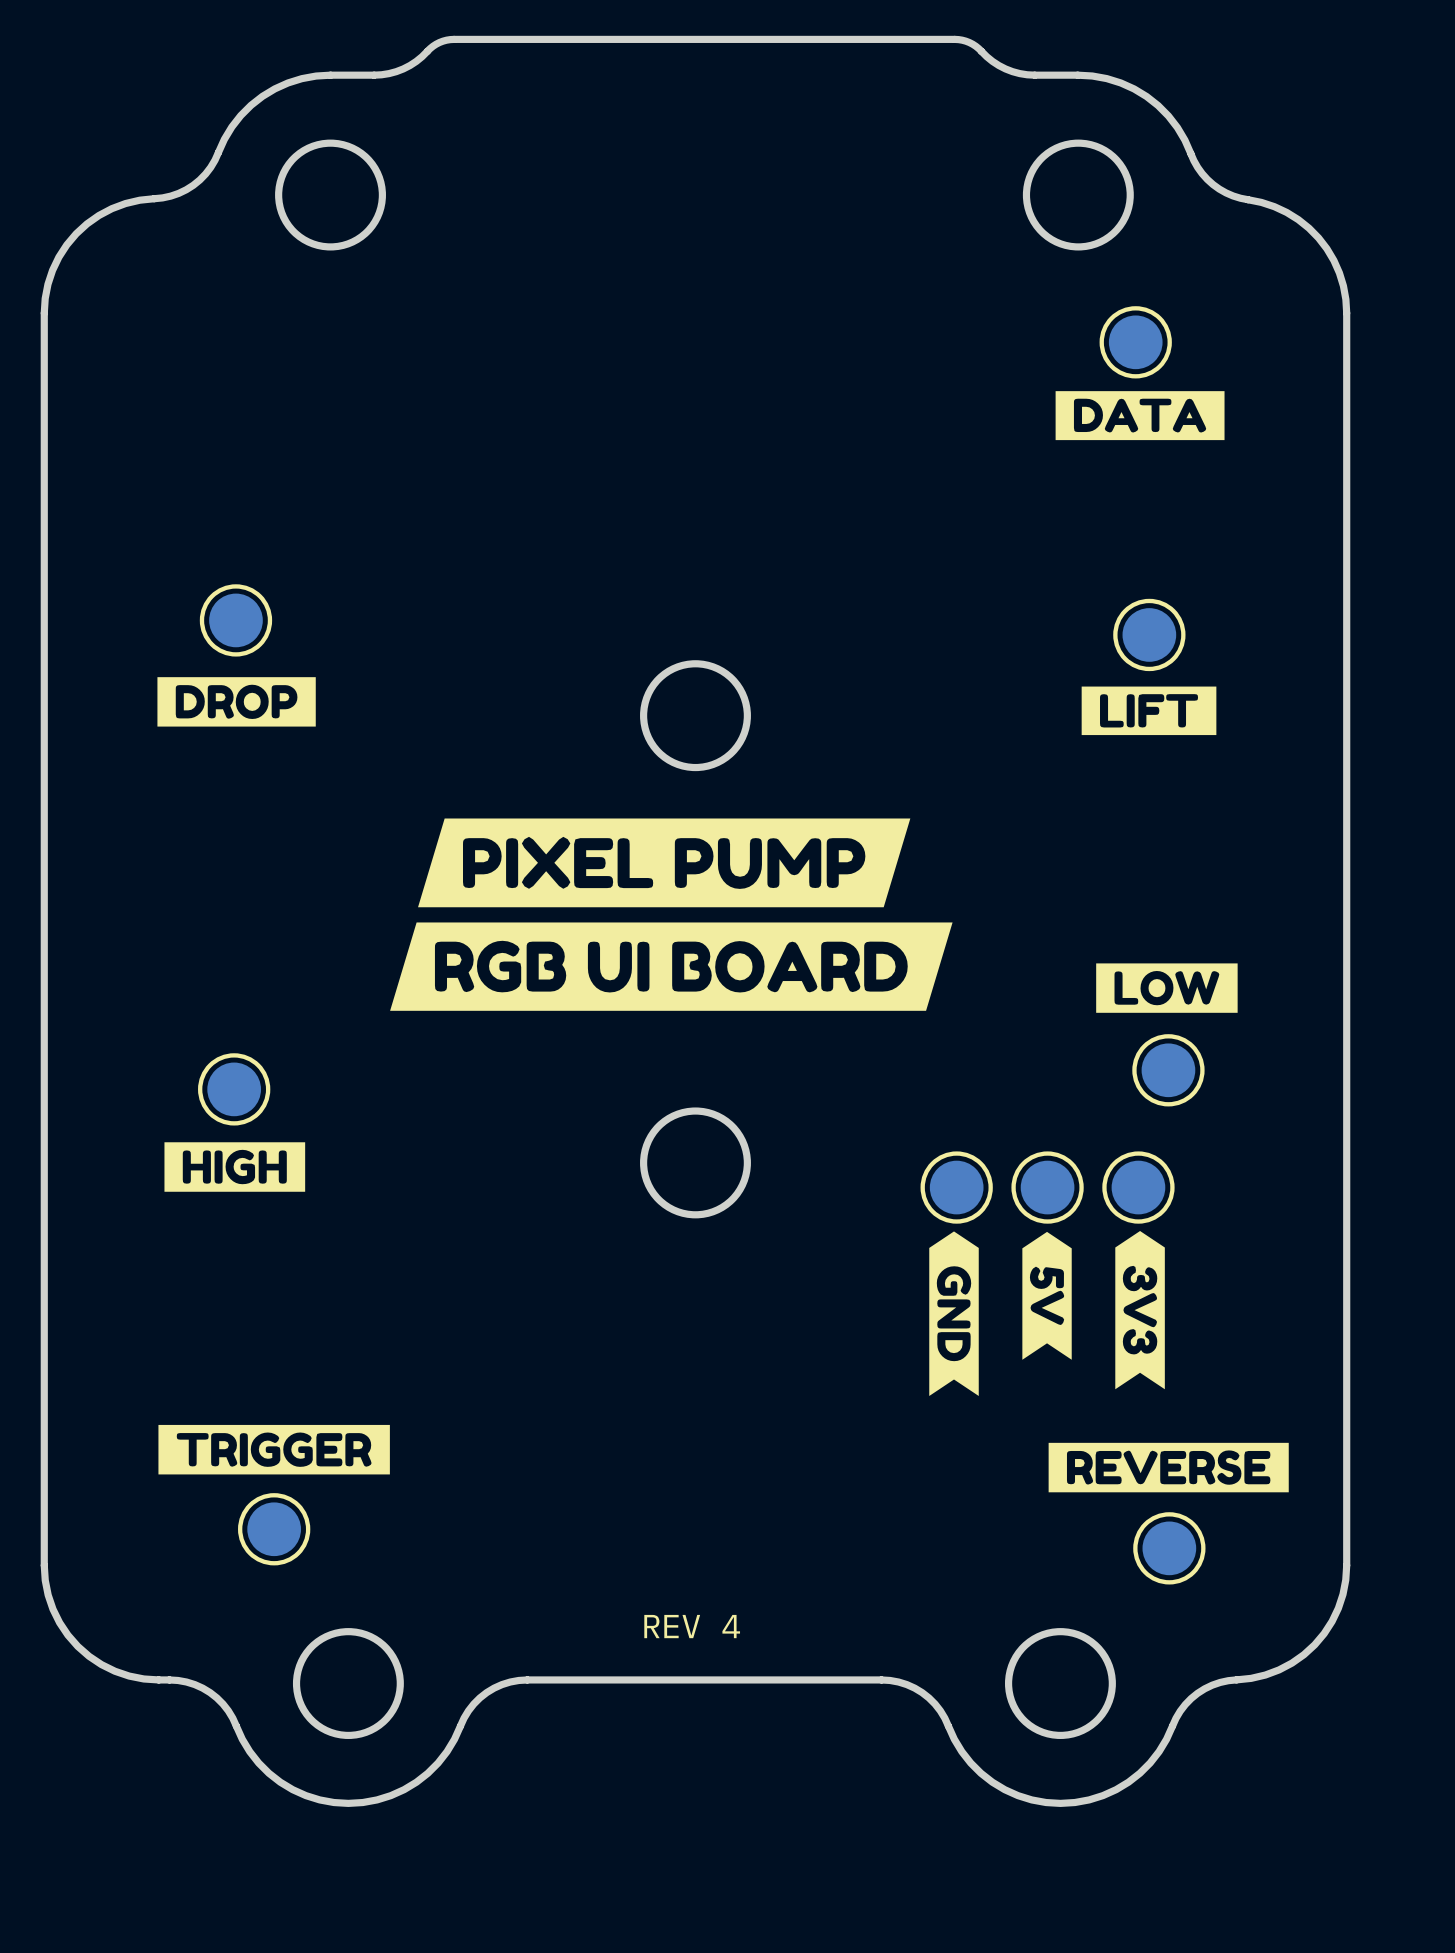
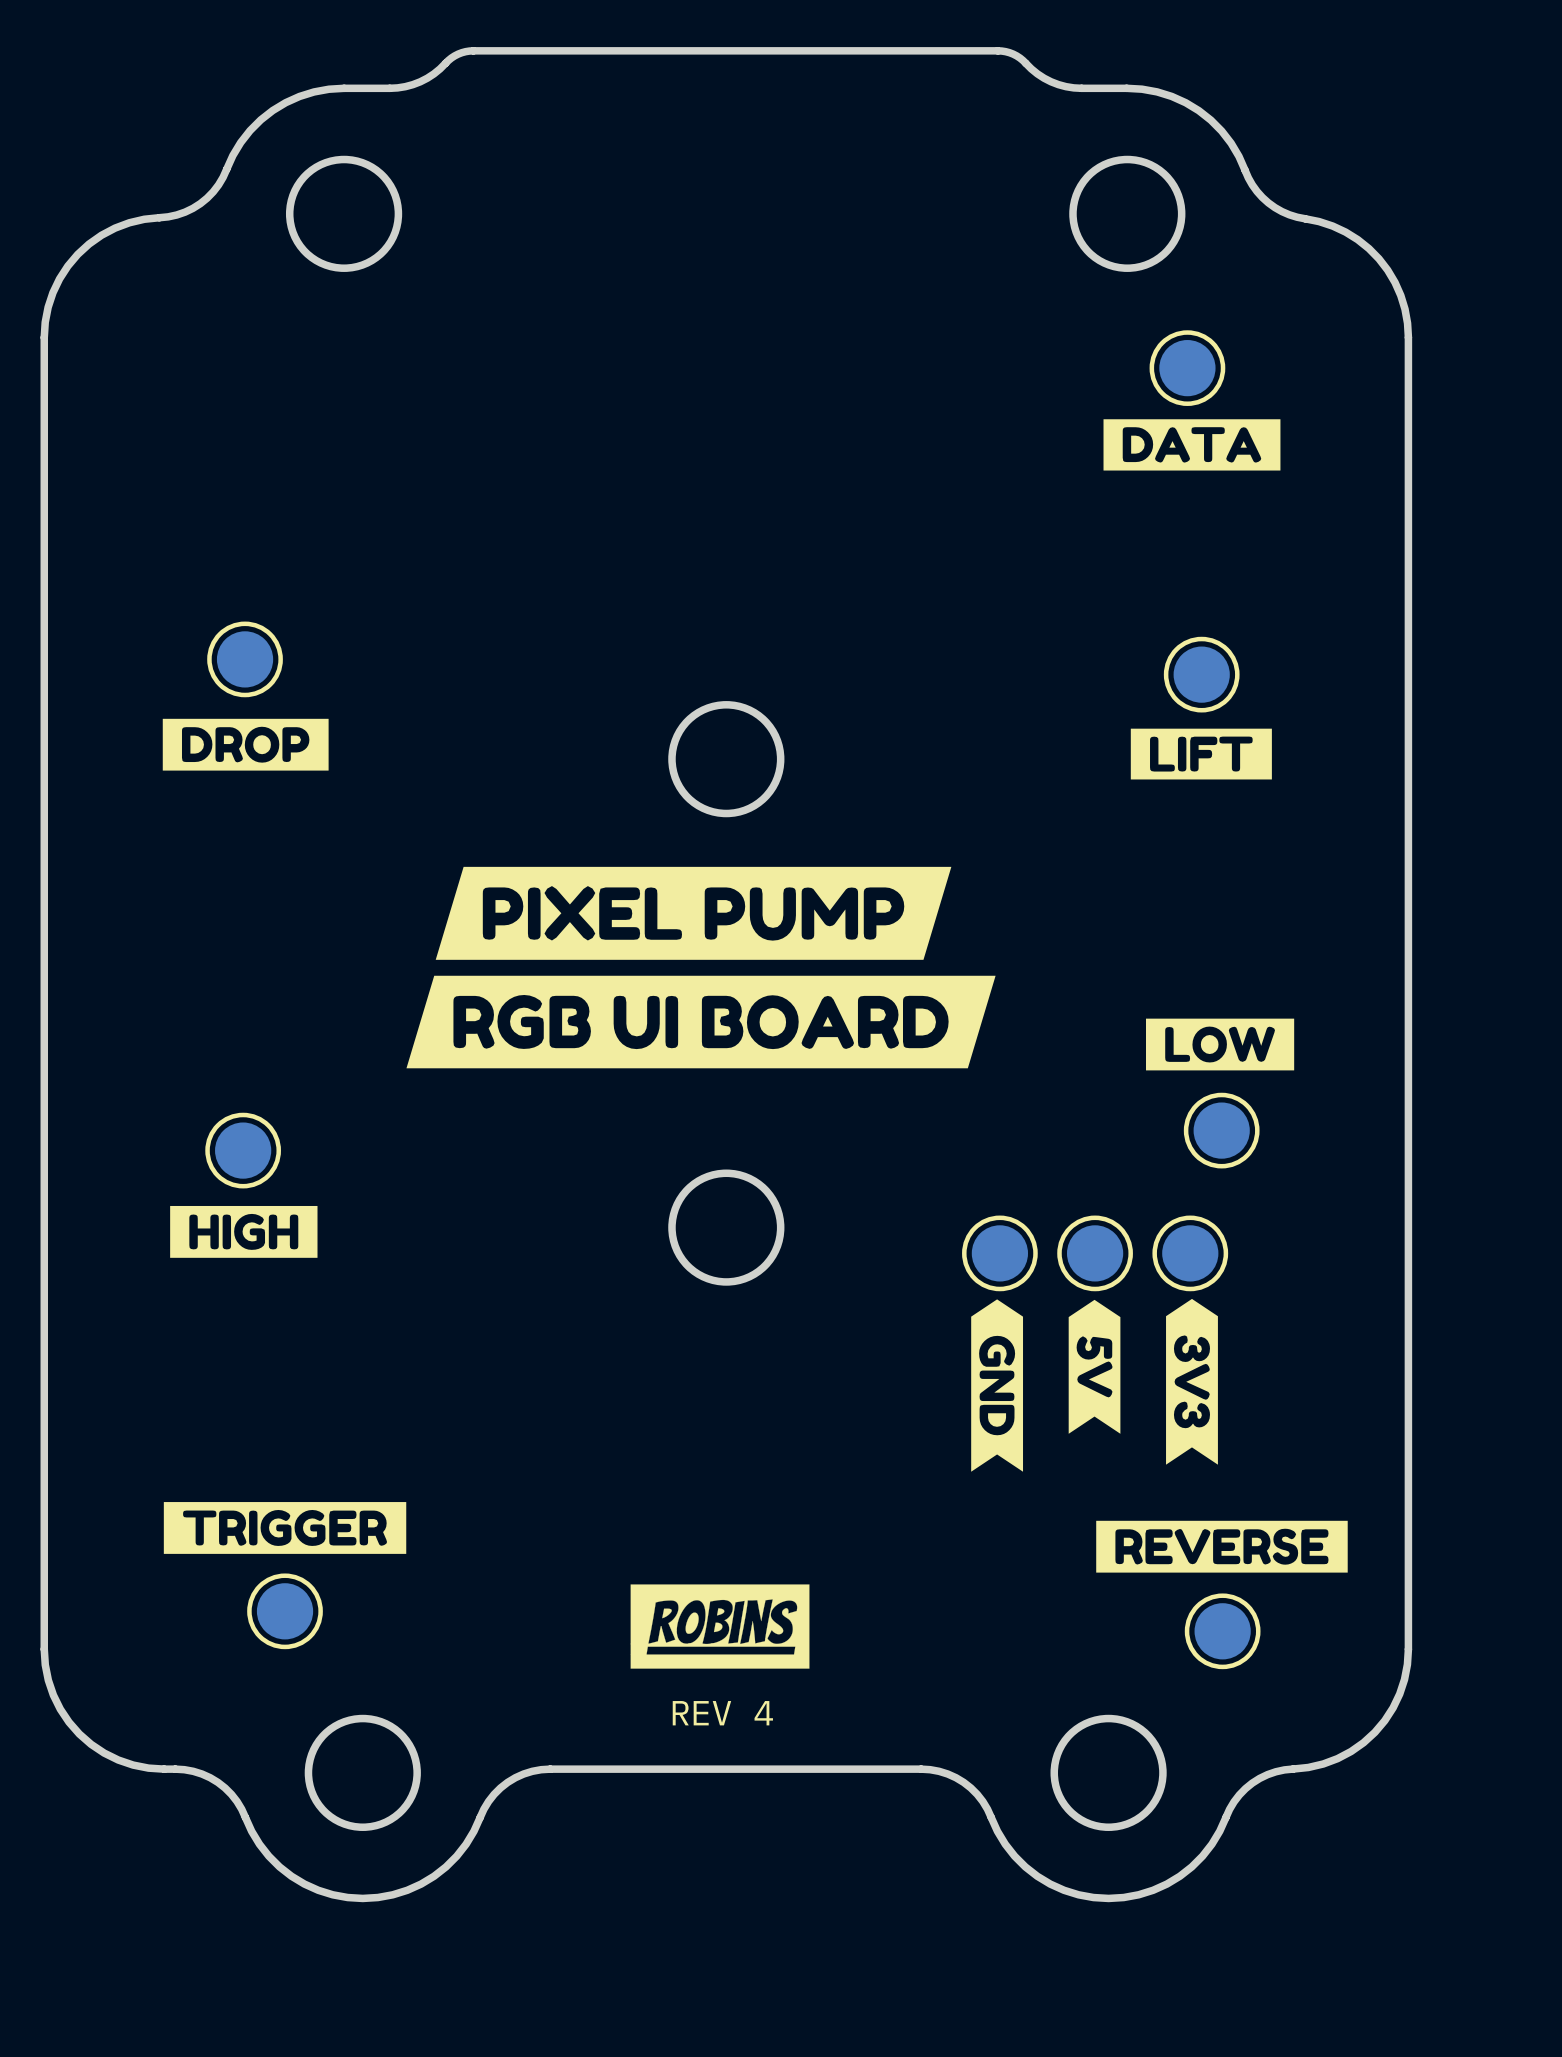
drawing: none -> [630, 1584, 810, 1669]

